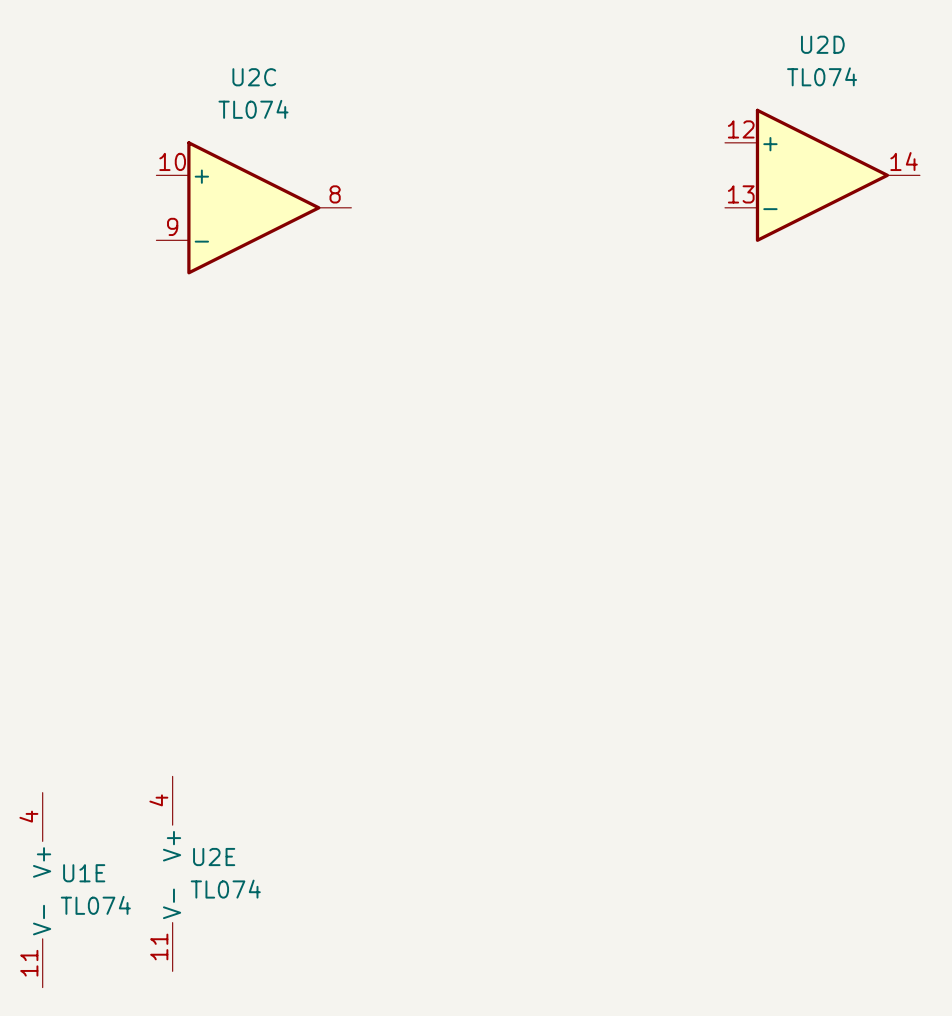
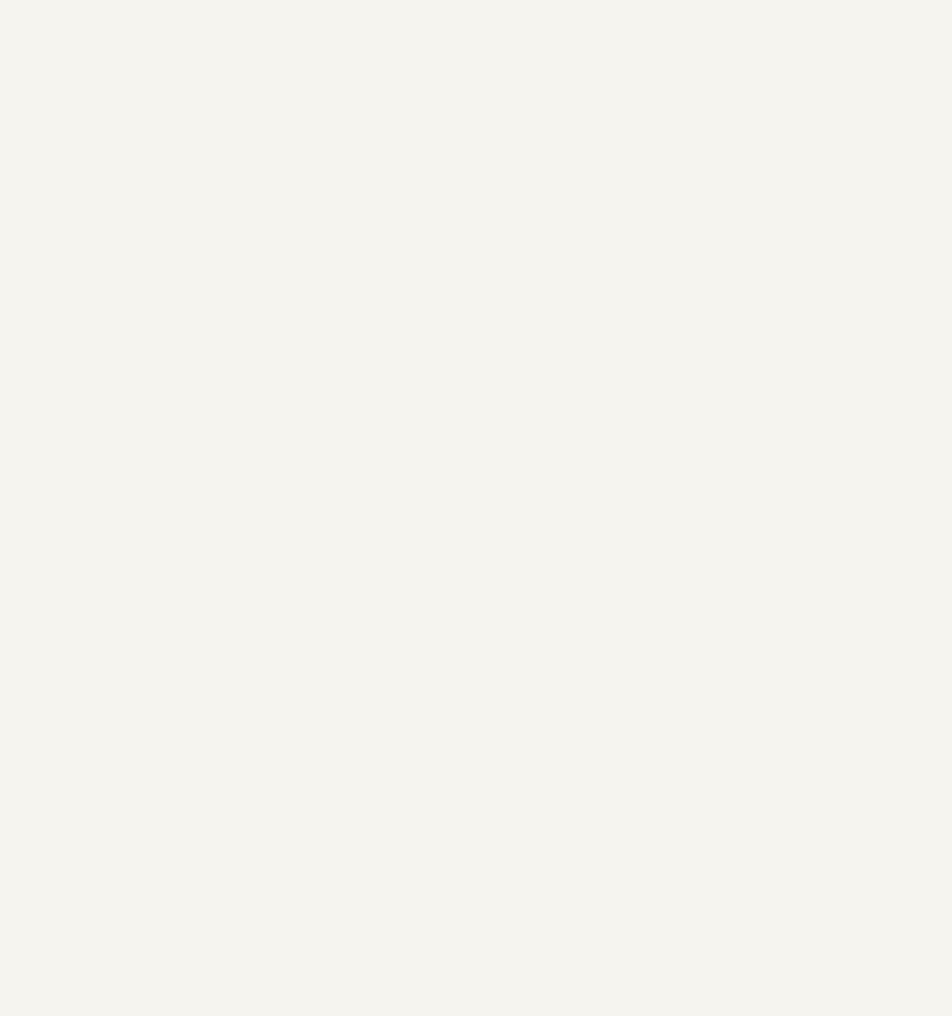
U2D: TL074 (822, 175) -> none
U2C: TL074 (253, 207) -> none
U2E: TL074 (172, 873) -> none
U1E: TL074 (42, 890) -> none

